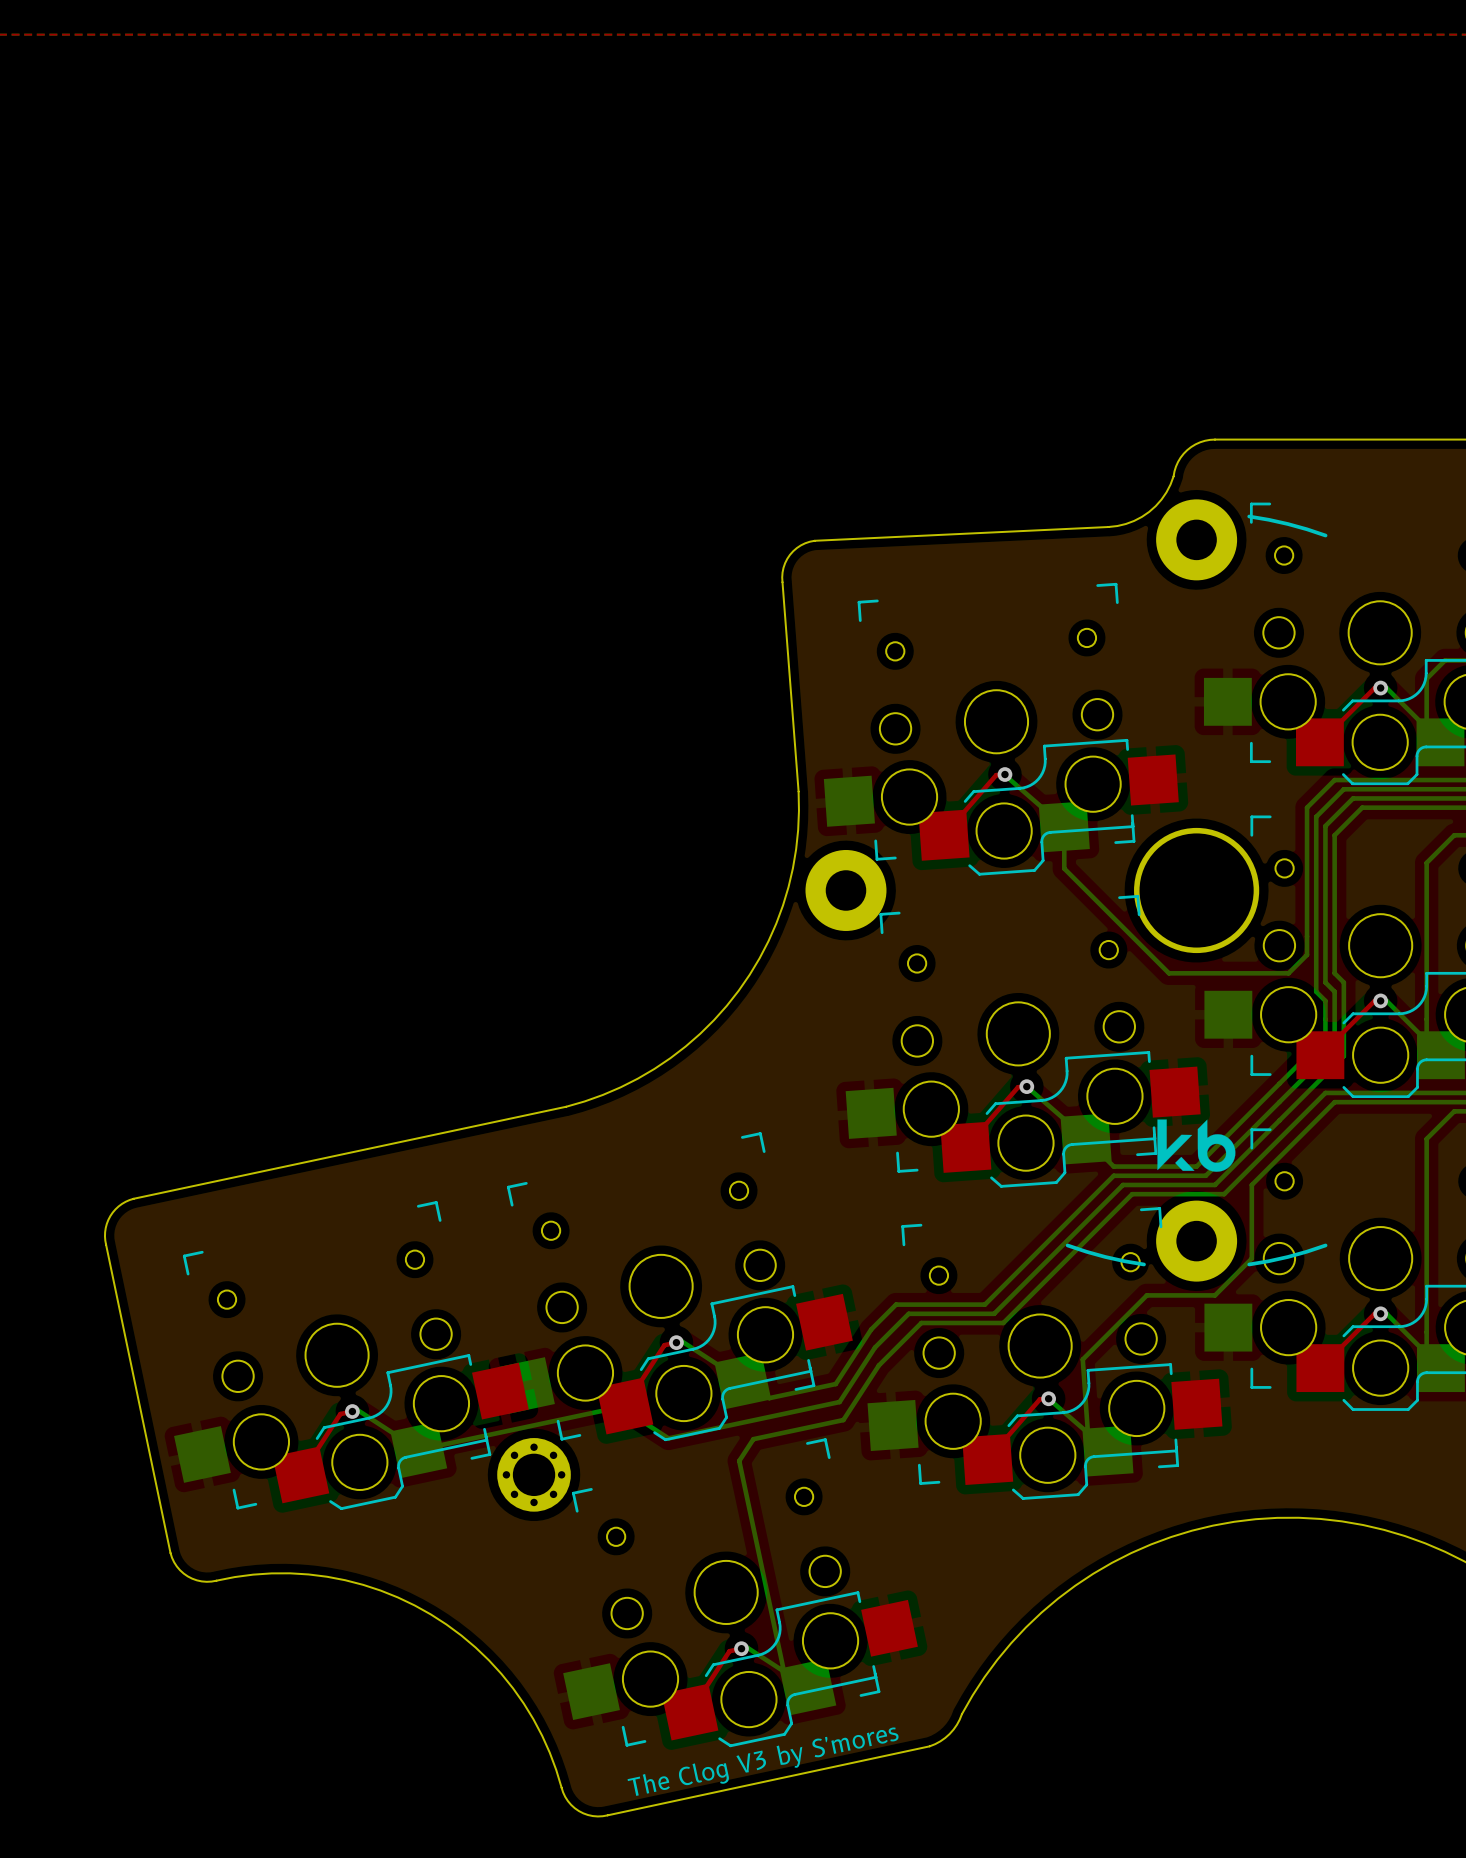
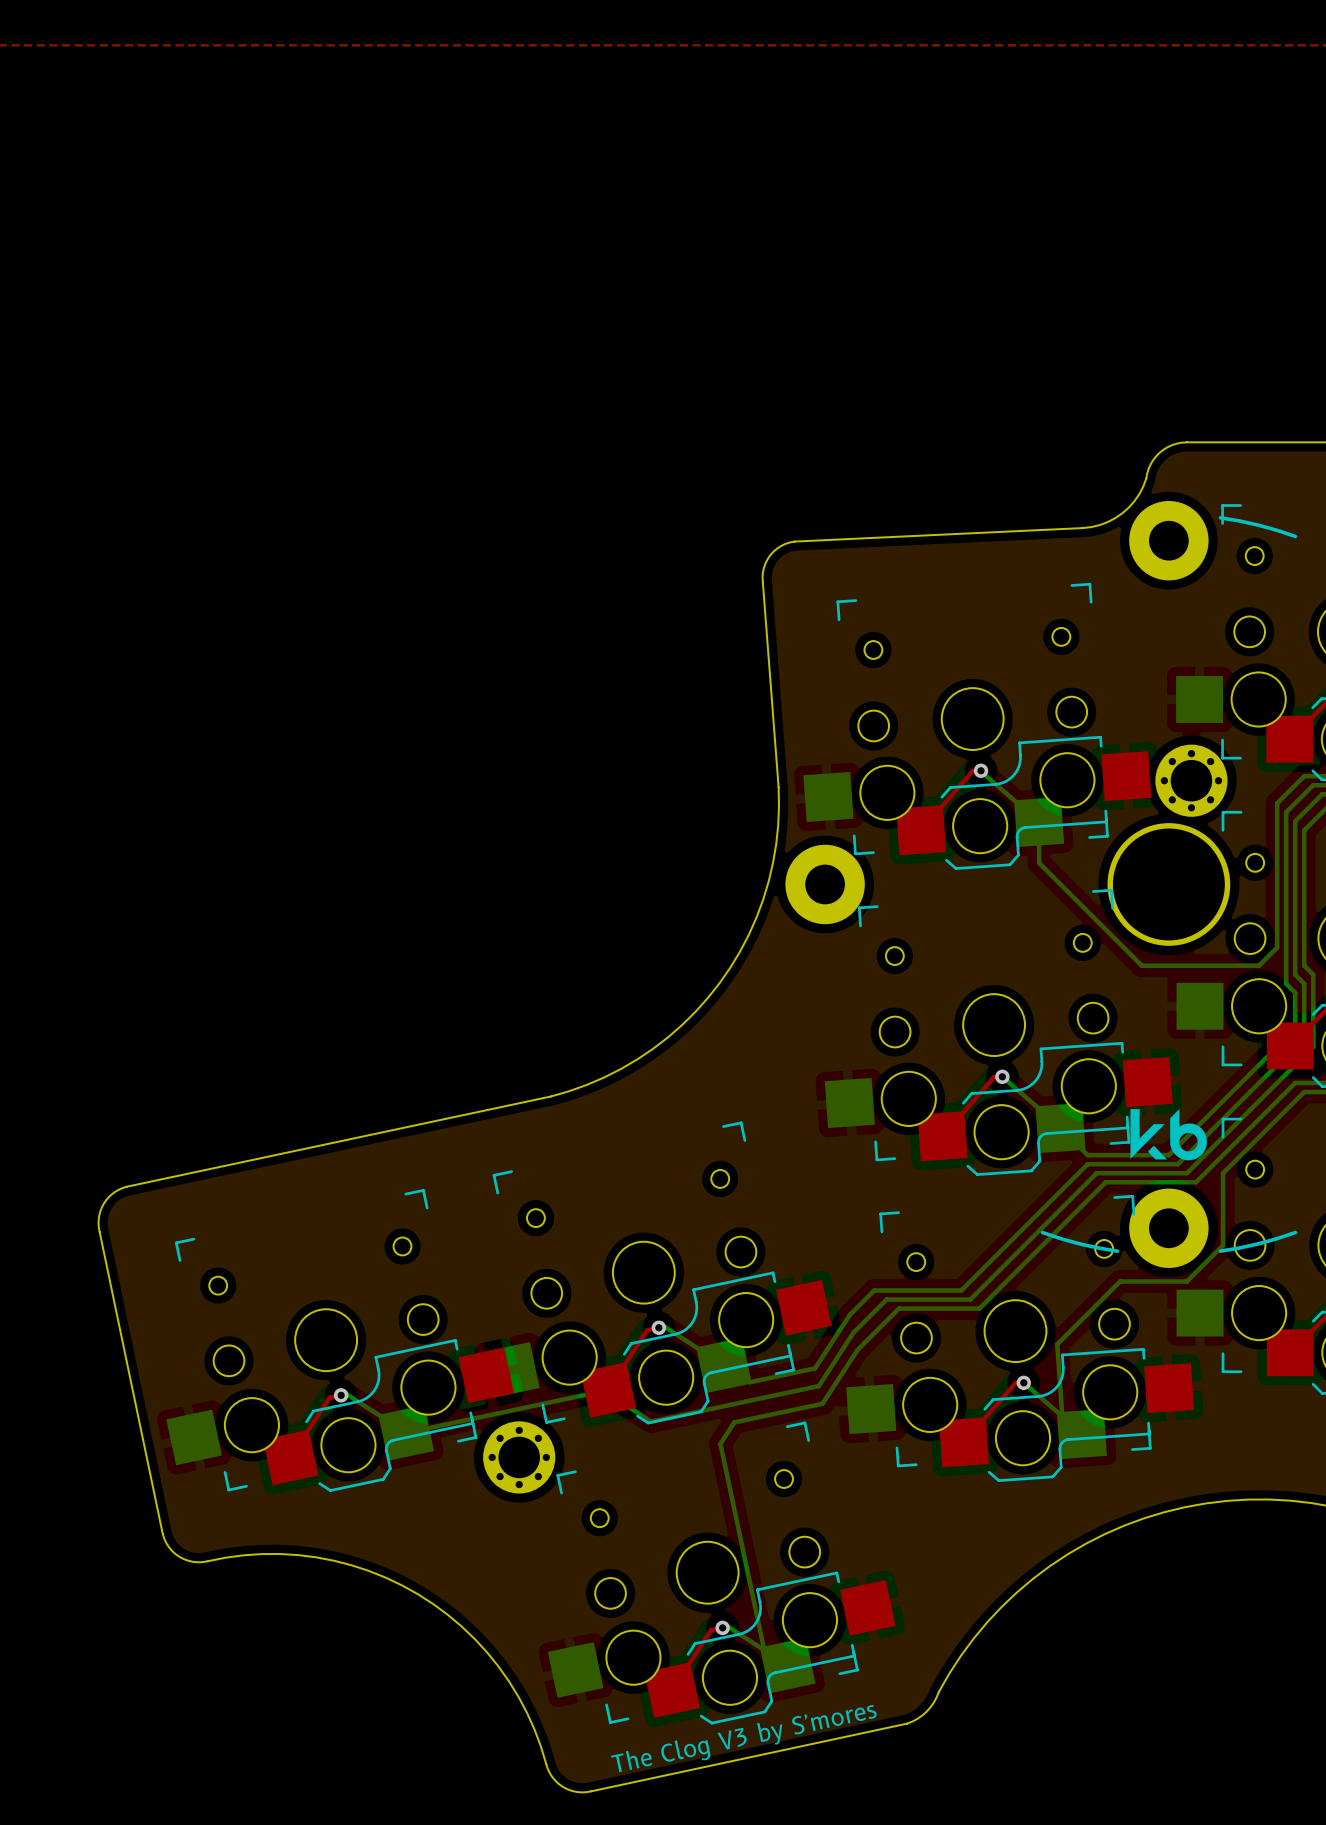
part: none -> (1191, 780)

